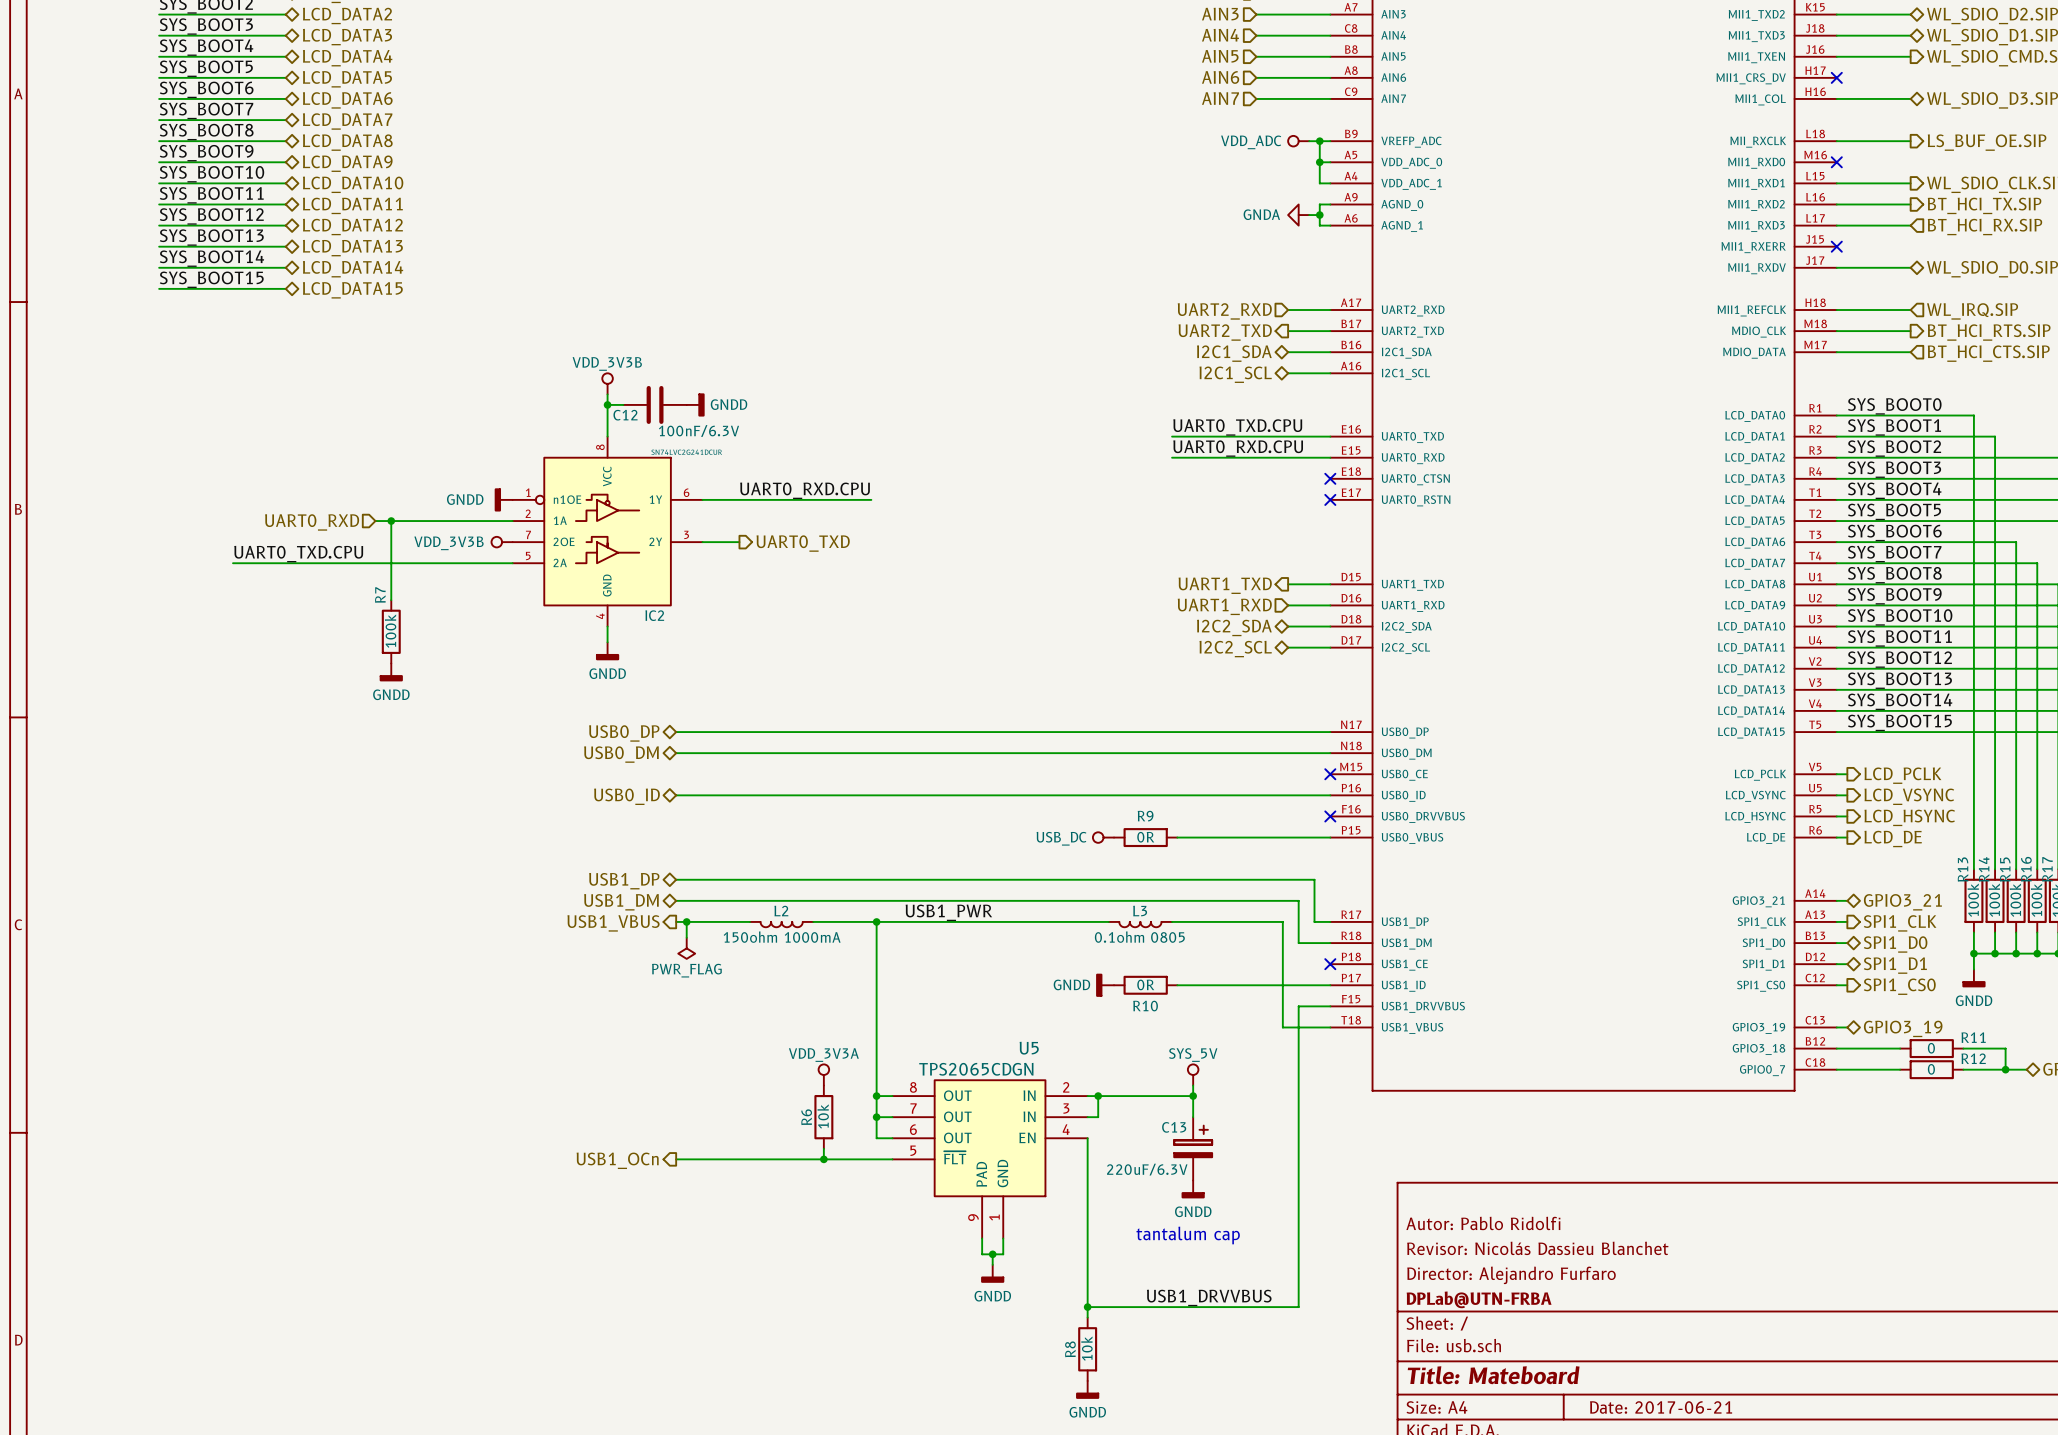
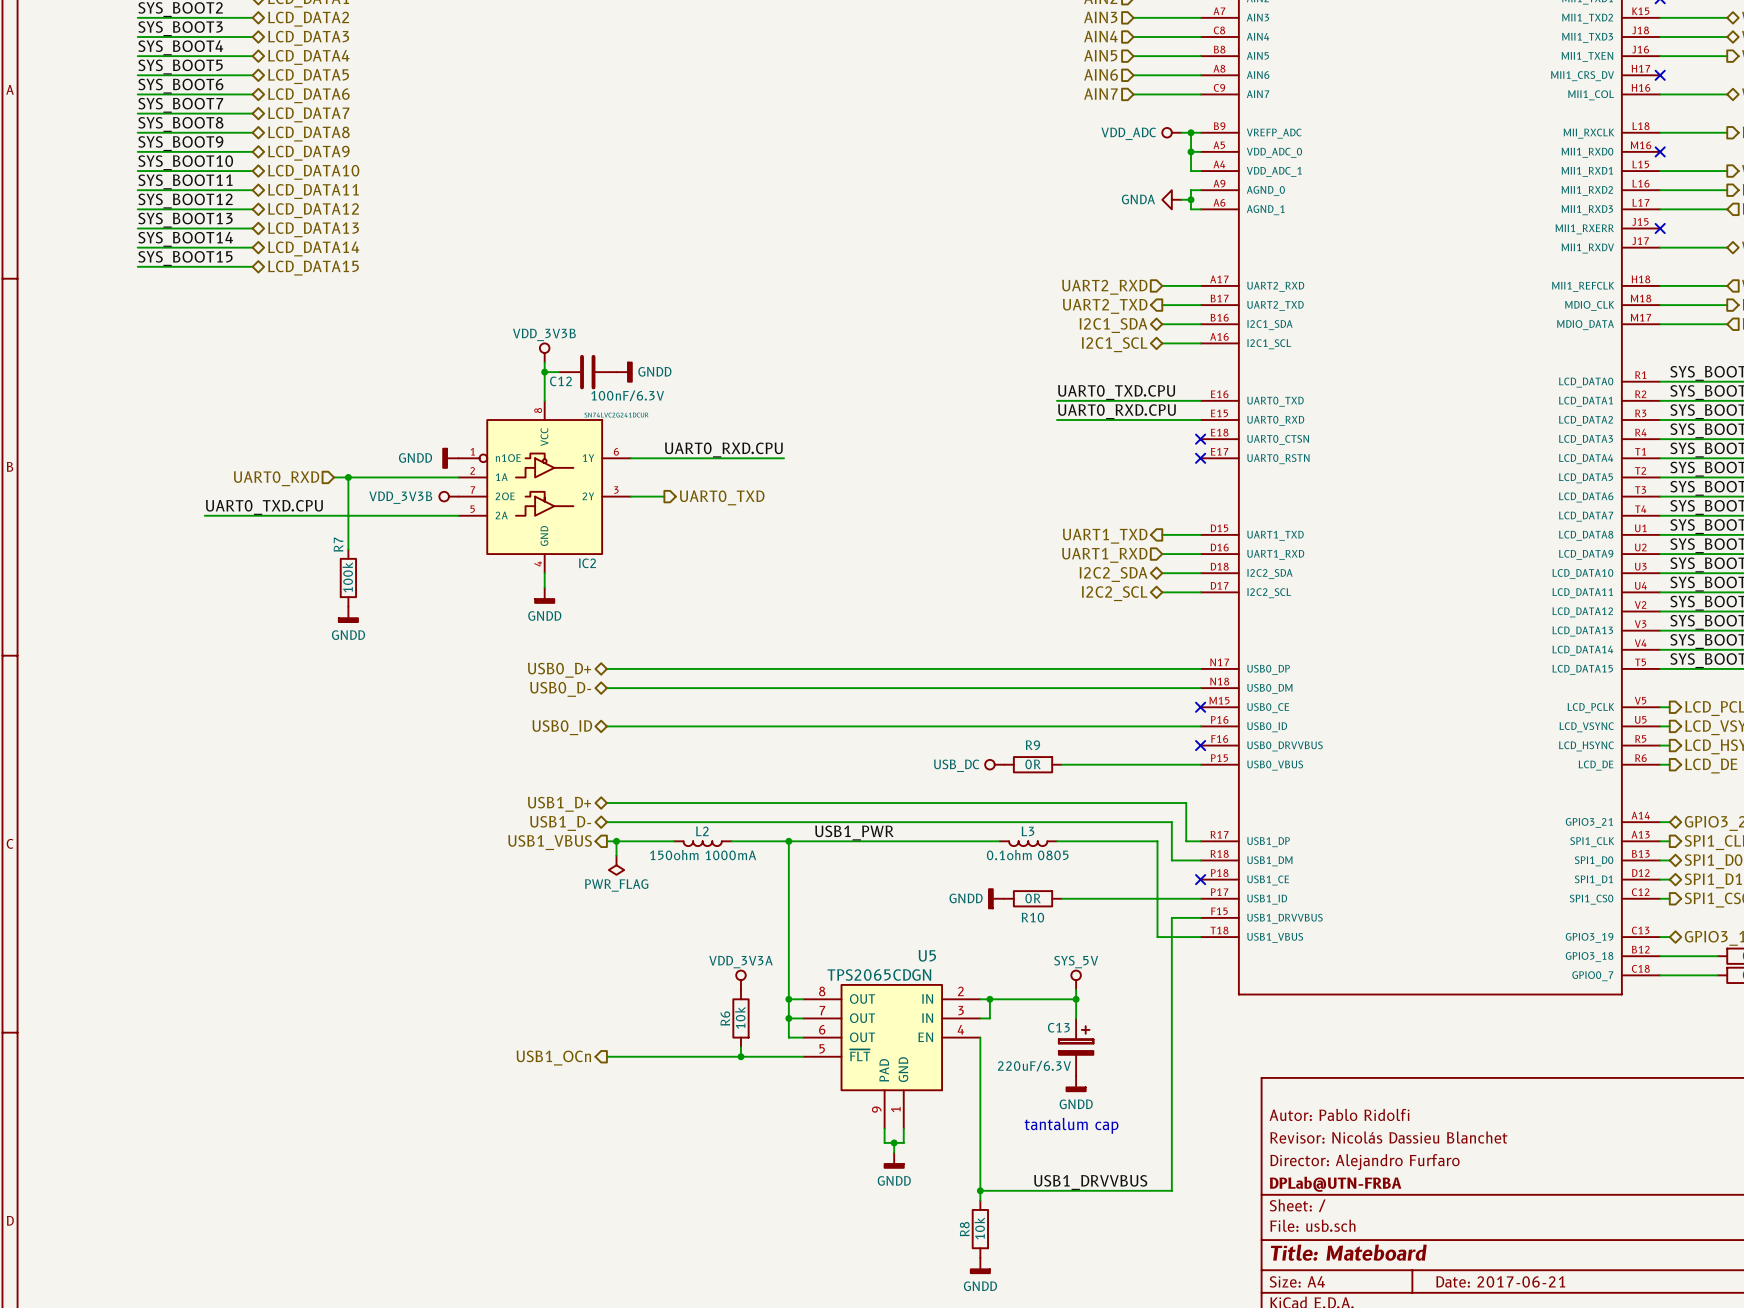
hierarchical label: USB0_DP (624, 733) -> USB0_D+ (559, 670)
hierarchical label: USB0_DM (621, 754) -> USB0_D- (560, 689)
hierarchical label: USB1_DP (624, 881) -> USB1_D+ (559, 804)
hierarchical label: USB1_DM (621, 902) -> USB1_D- (560, 823)

